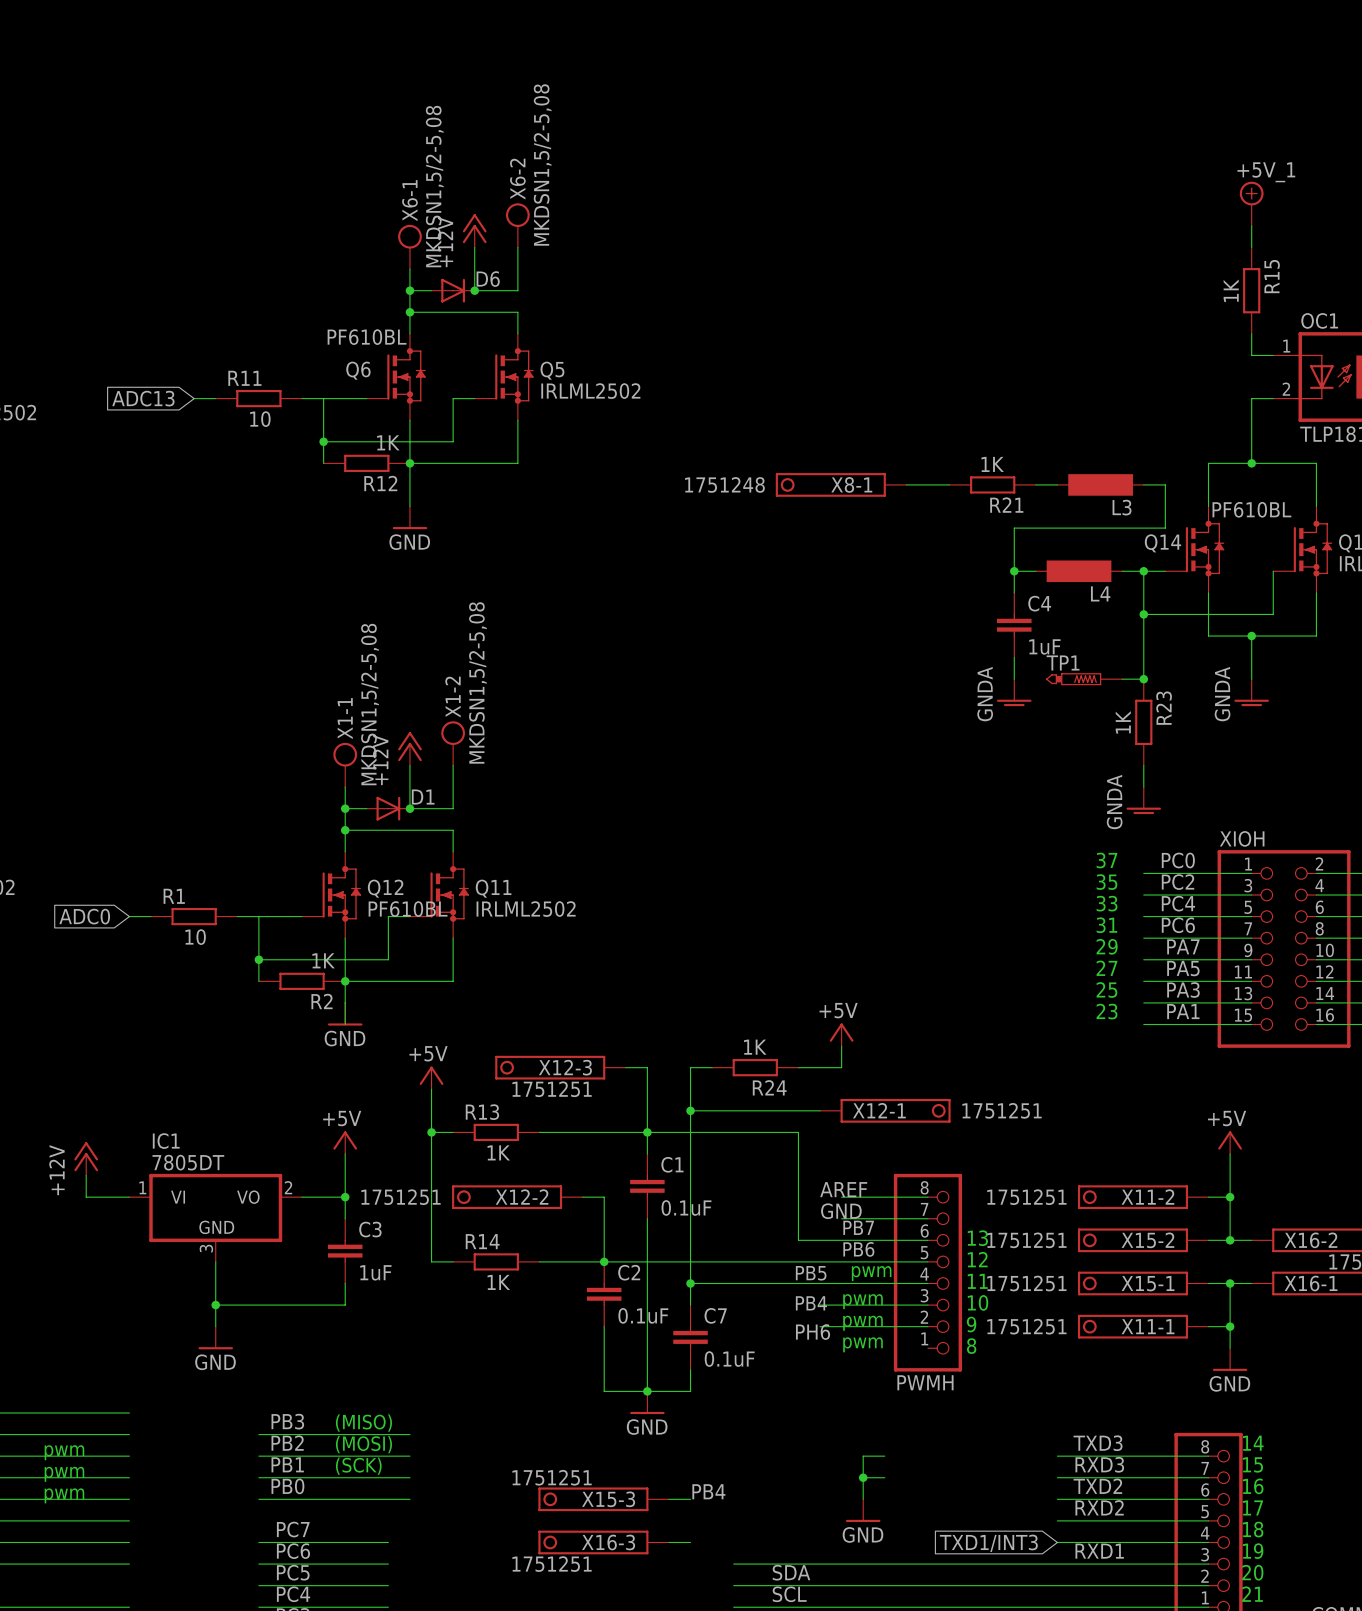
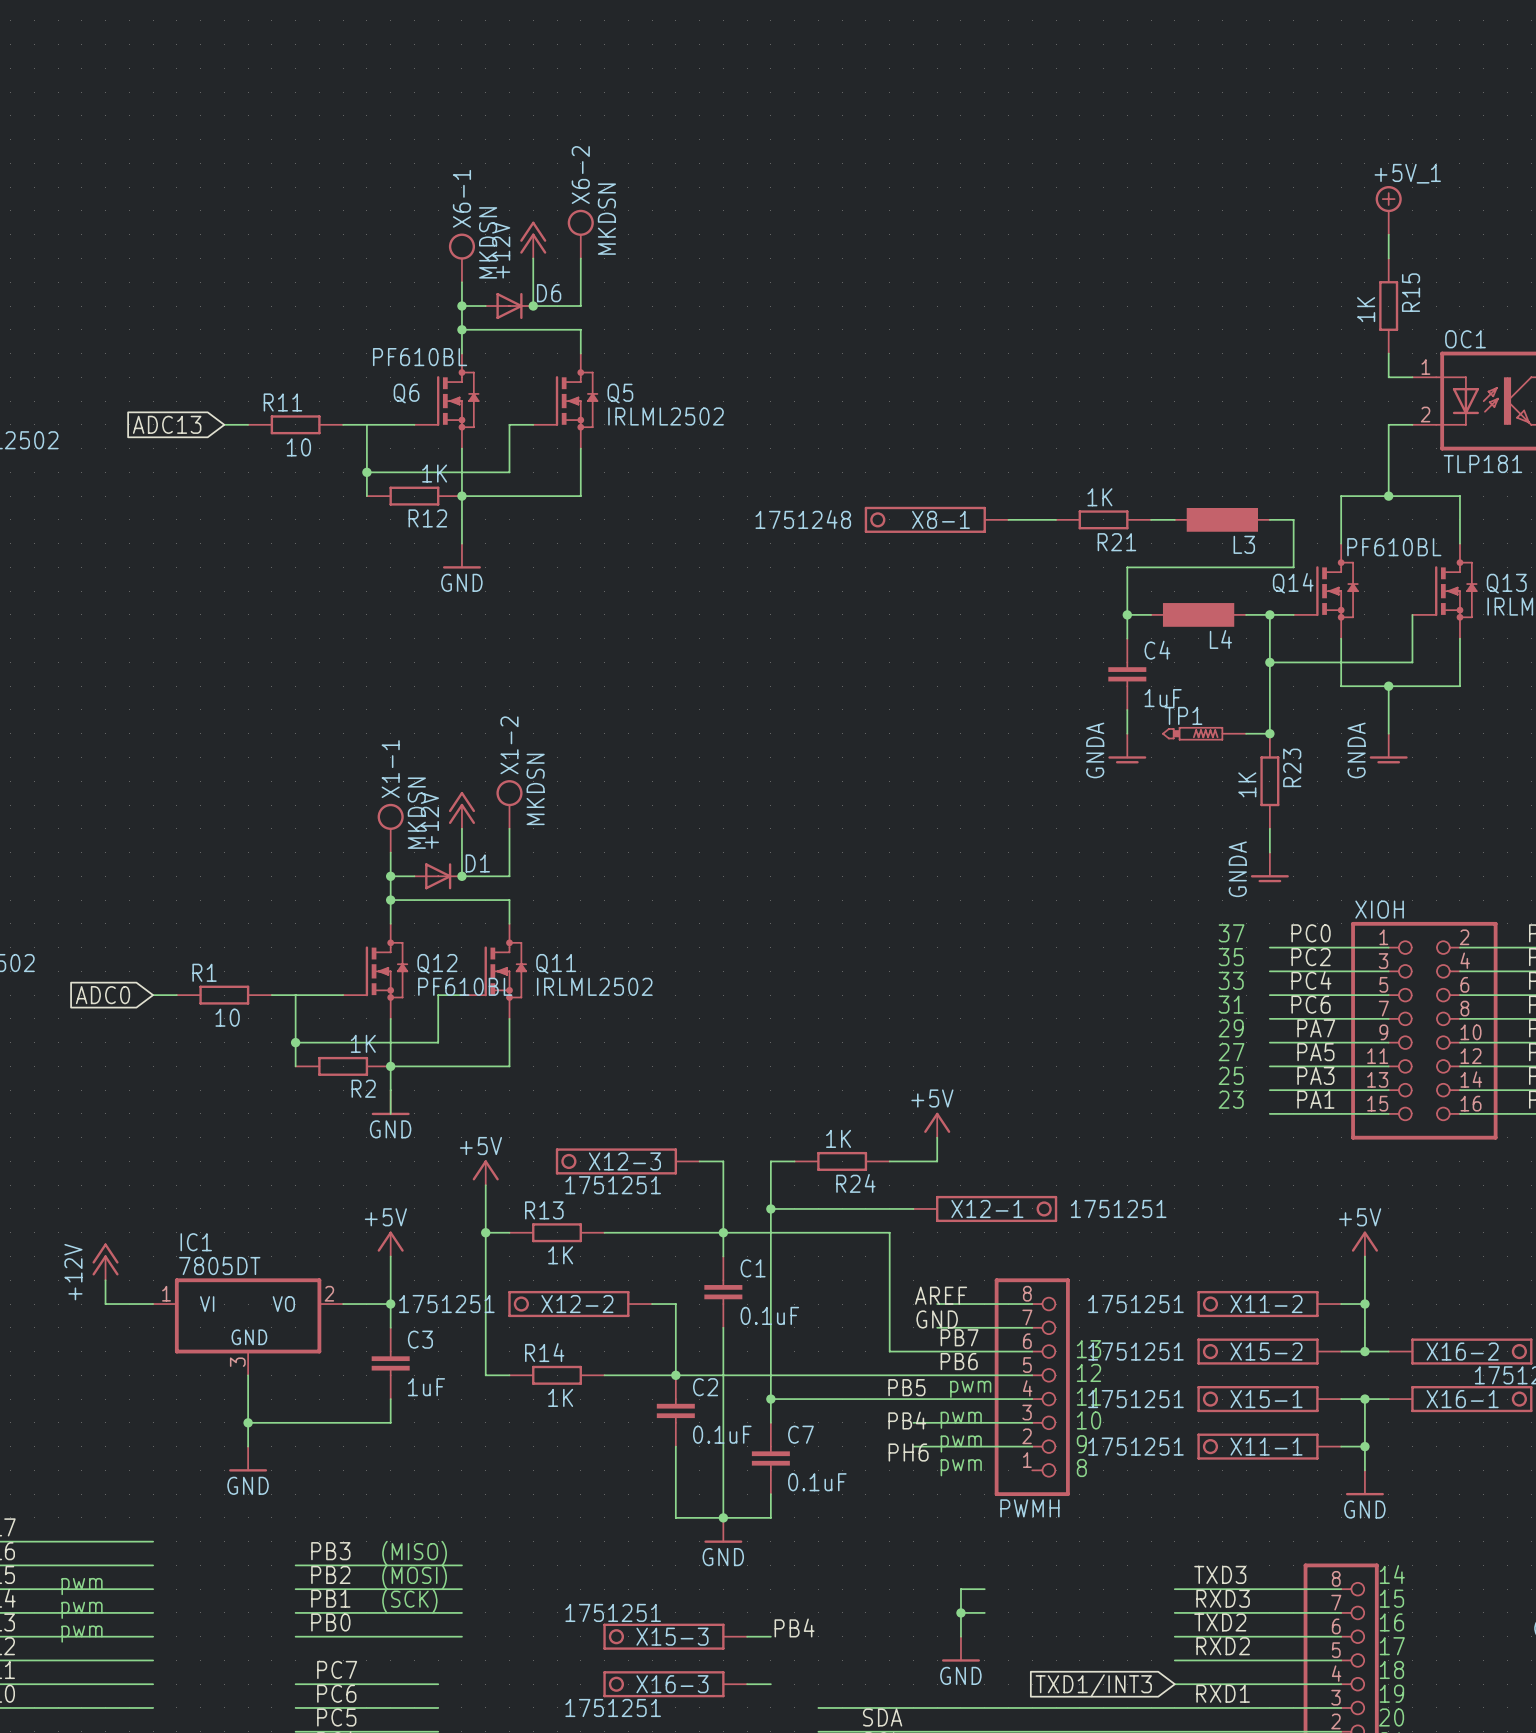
X6-2 value: MKDSN1,5/2-5,08 (542, 164) -> MKDSN (606, 219)
X6-1 value: MKDSN1,5/2-5,08 (434, 186) -> MKDSN (488, 242)
X1-2 value: MKDSN1,5/2-5,08 (477, 682) -> MKDSN (535, 789)
X1-1 value: MKDSN1,5/2-5,08 (370, 704) -> MKDSN (416, 813)

